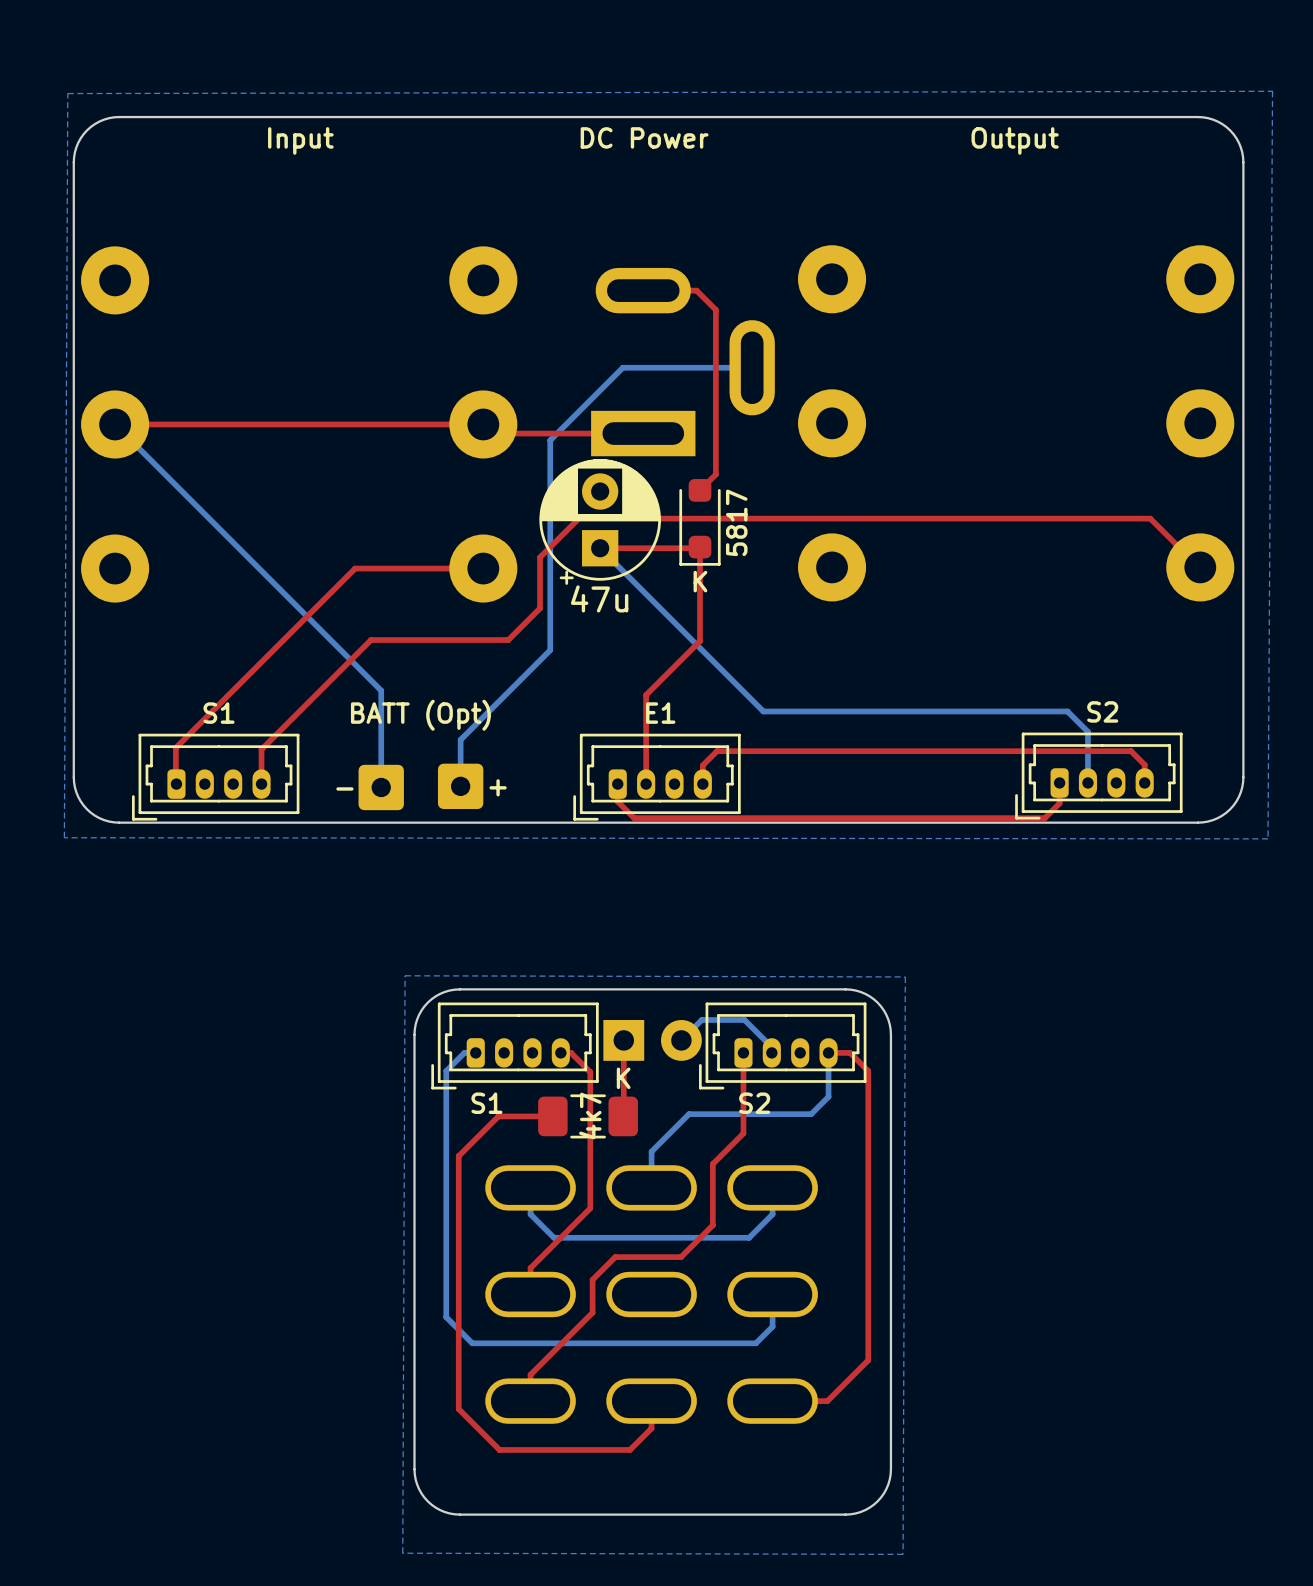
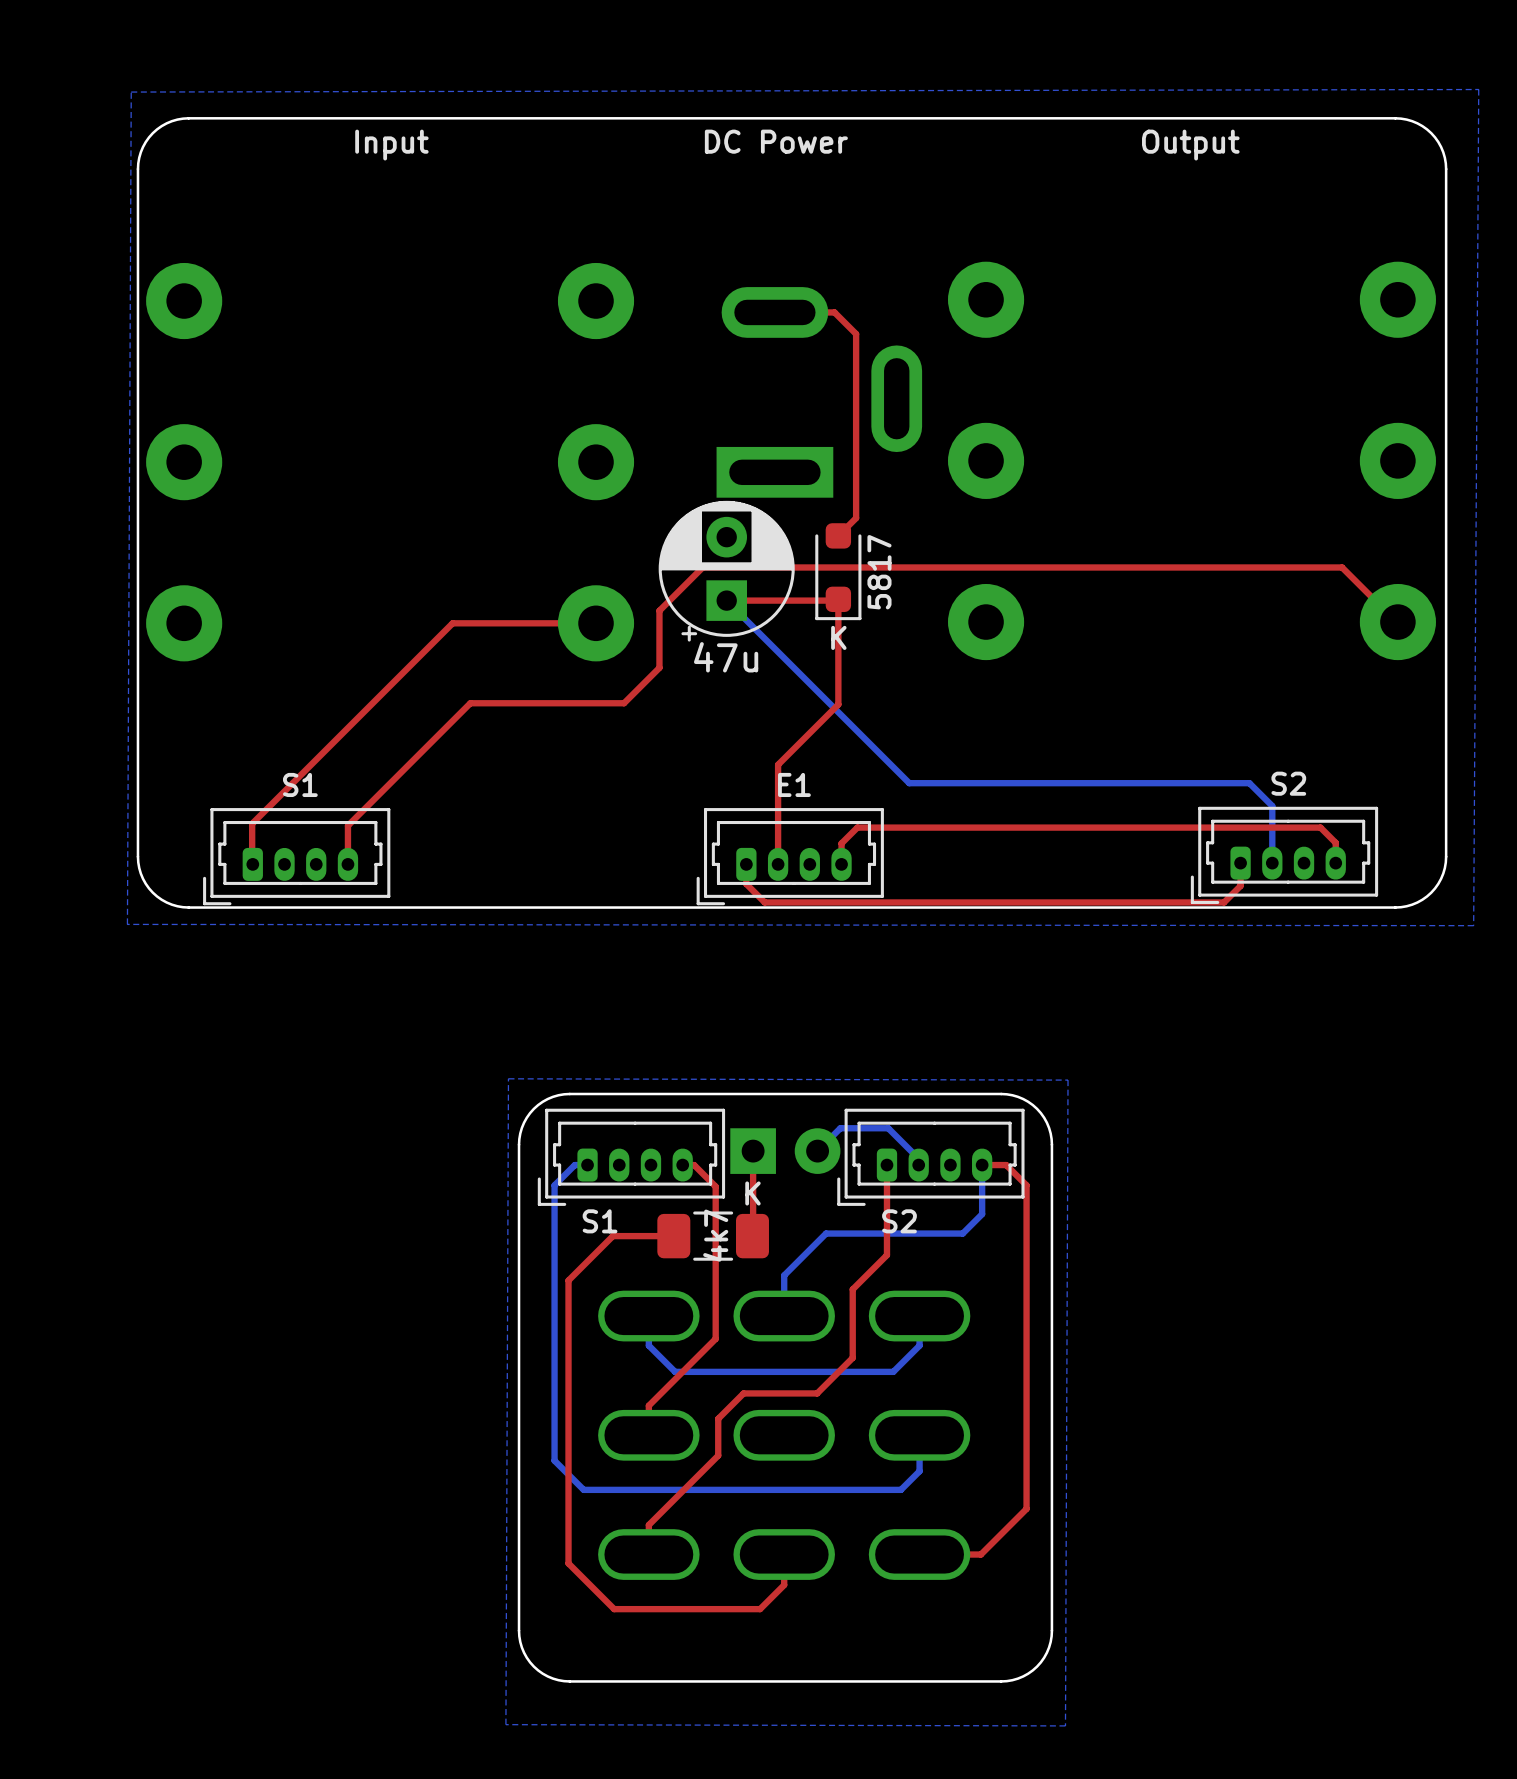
bottom track: (752, 367) (622, 367) (550, 440) (550, 650) (460, 739) (460, 786) -> none
top track: (115, 424) (483, 424) (492, 433) (643, 433) -> none
bottom track: (115, 424) (381, 690) (381, 787) -> none
part: (460, 786) -> none
part: (381, 787) -> none

